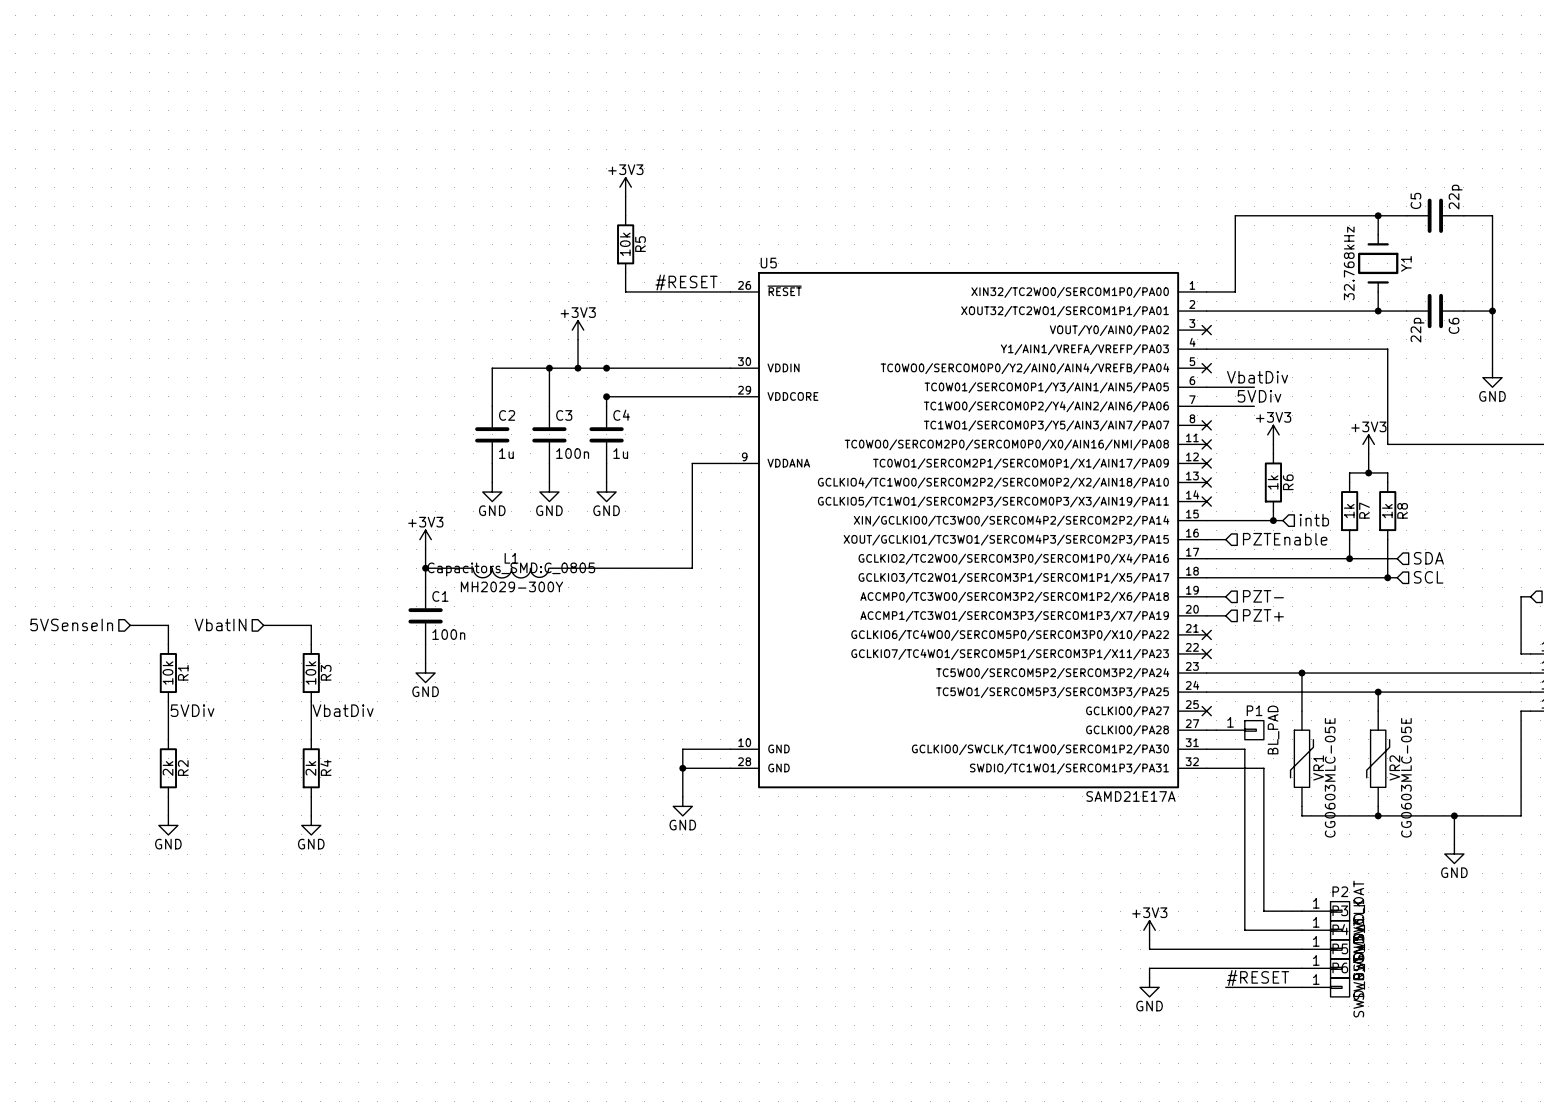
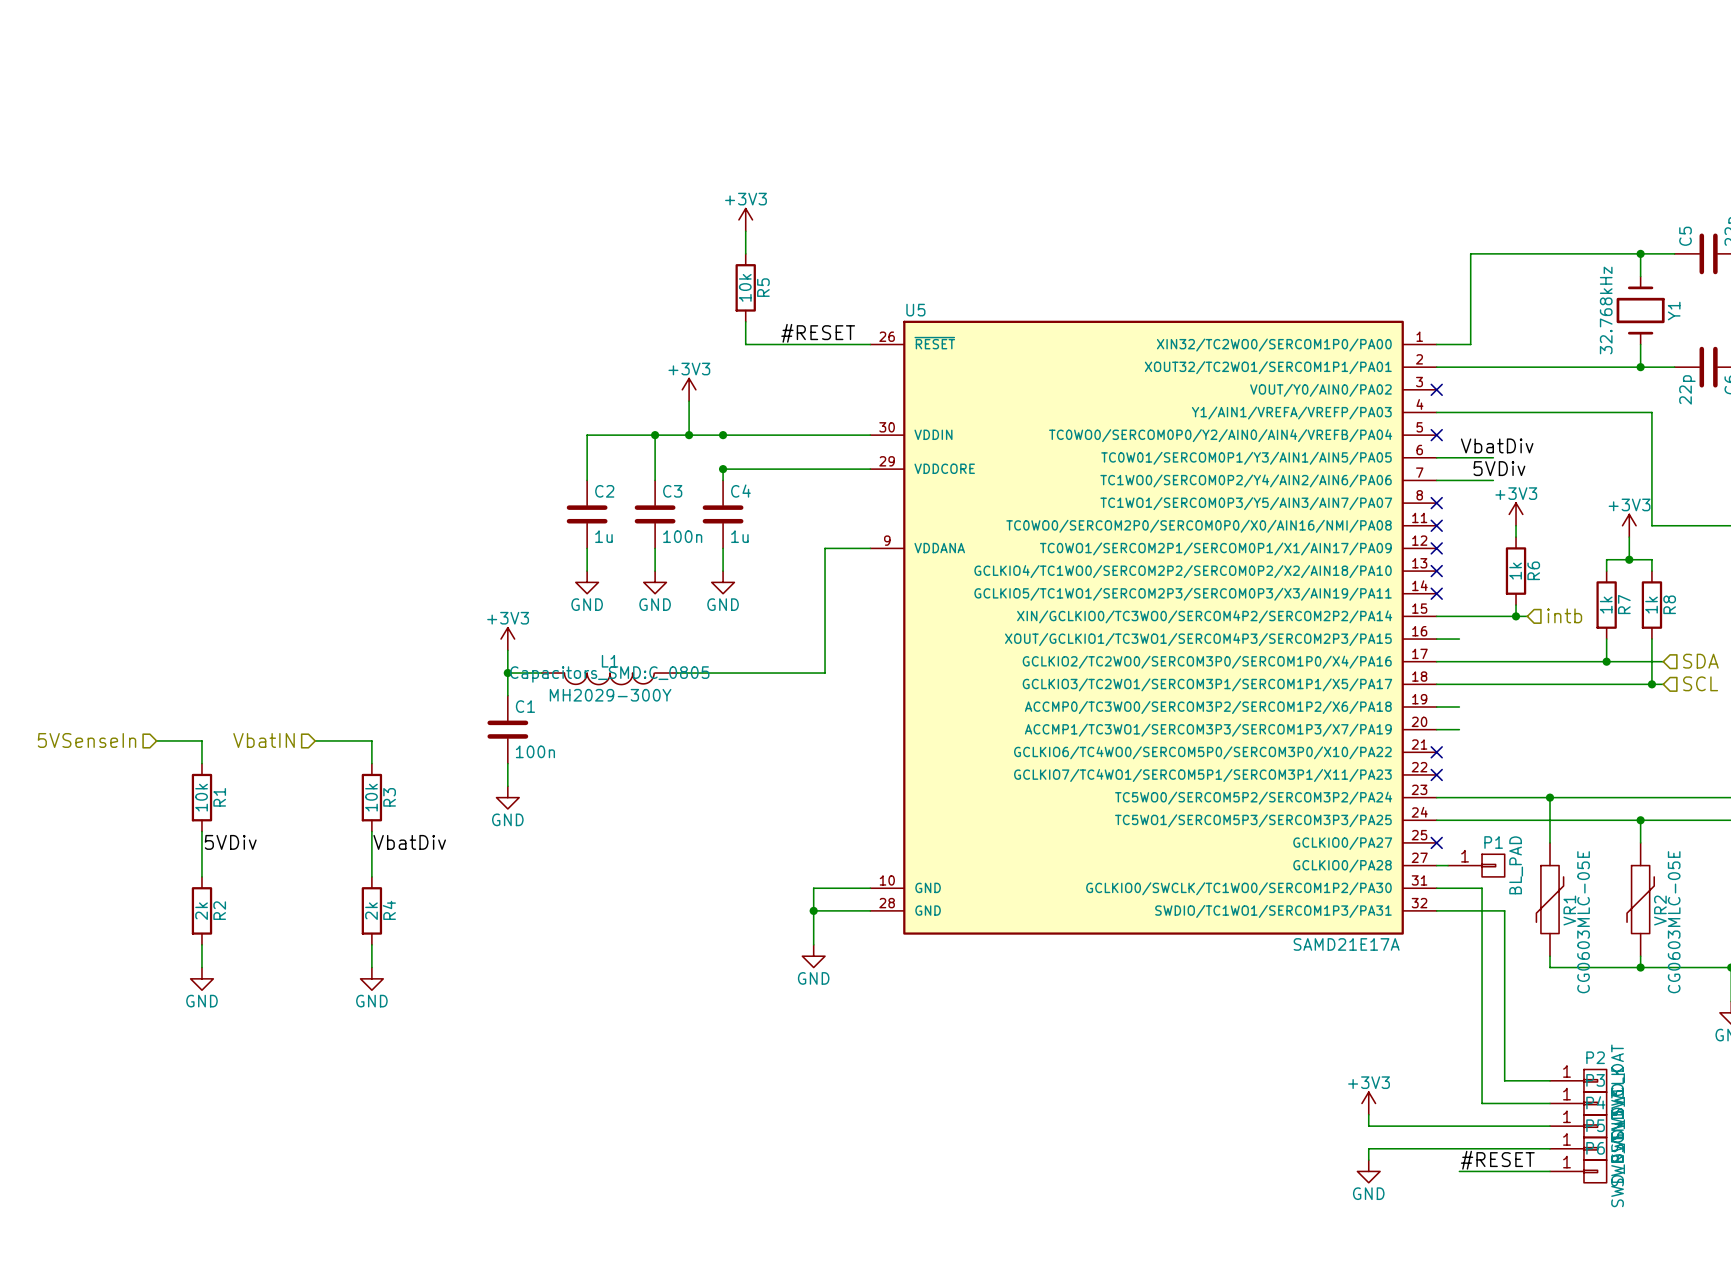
hierarchical label: PZTEnable (1285, 539) -> none
hierarchical label: PZT- (1263, 596) -> none
hierarchical label: PZT+ (1263, 615) -> none

